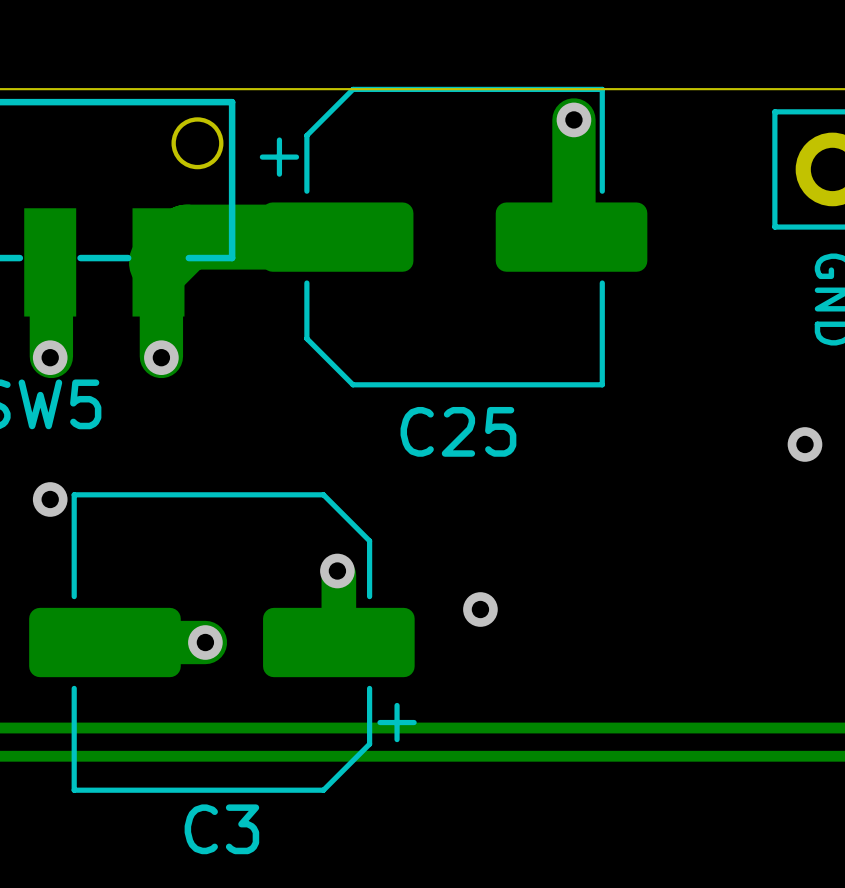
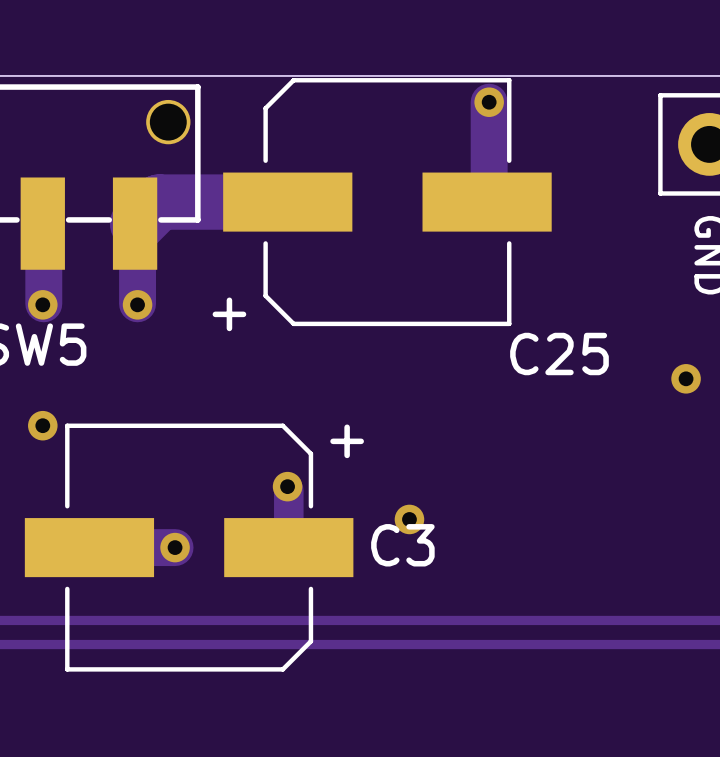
C25 footprint: [259, 86, 648, 388] -> [223, 78, 552, 327]
C25 name position: C25 (458, 431) -> C25 (559, 353)
C3 footprint: [29, 492, 417, 793] -> [24, 423, 354, 672]
C3 name position: C3 (221, 829) -> C3 (402, 545)

